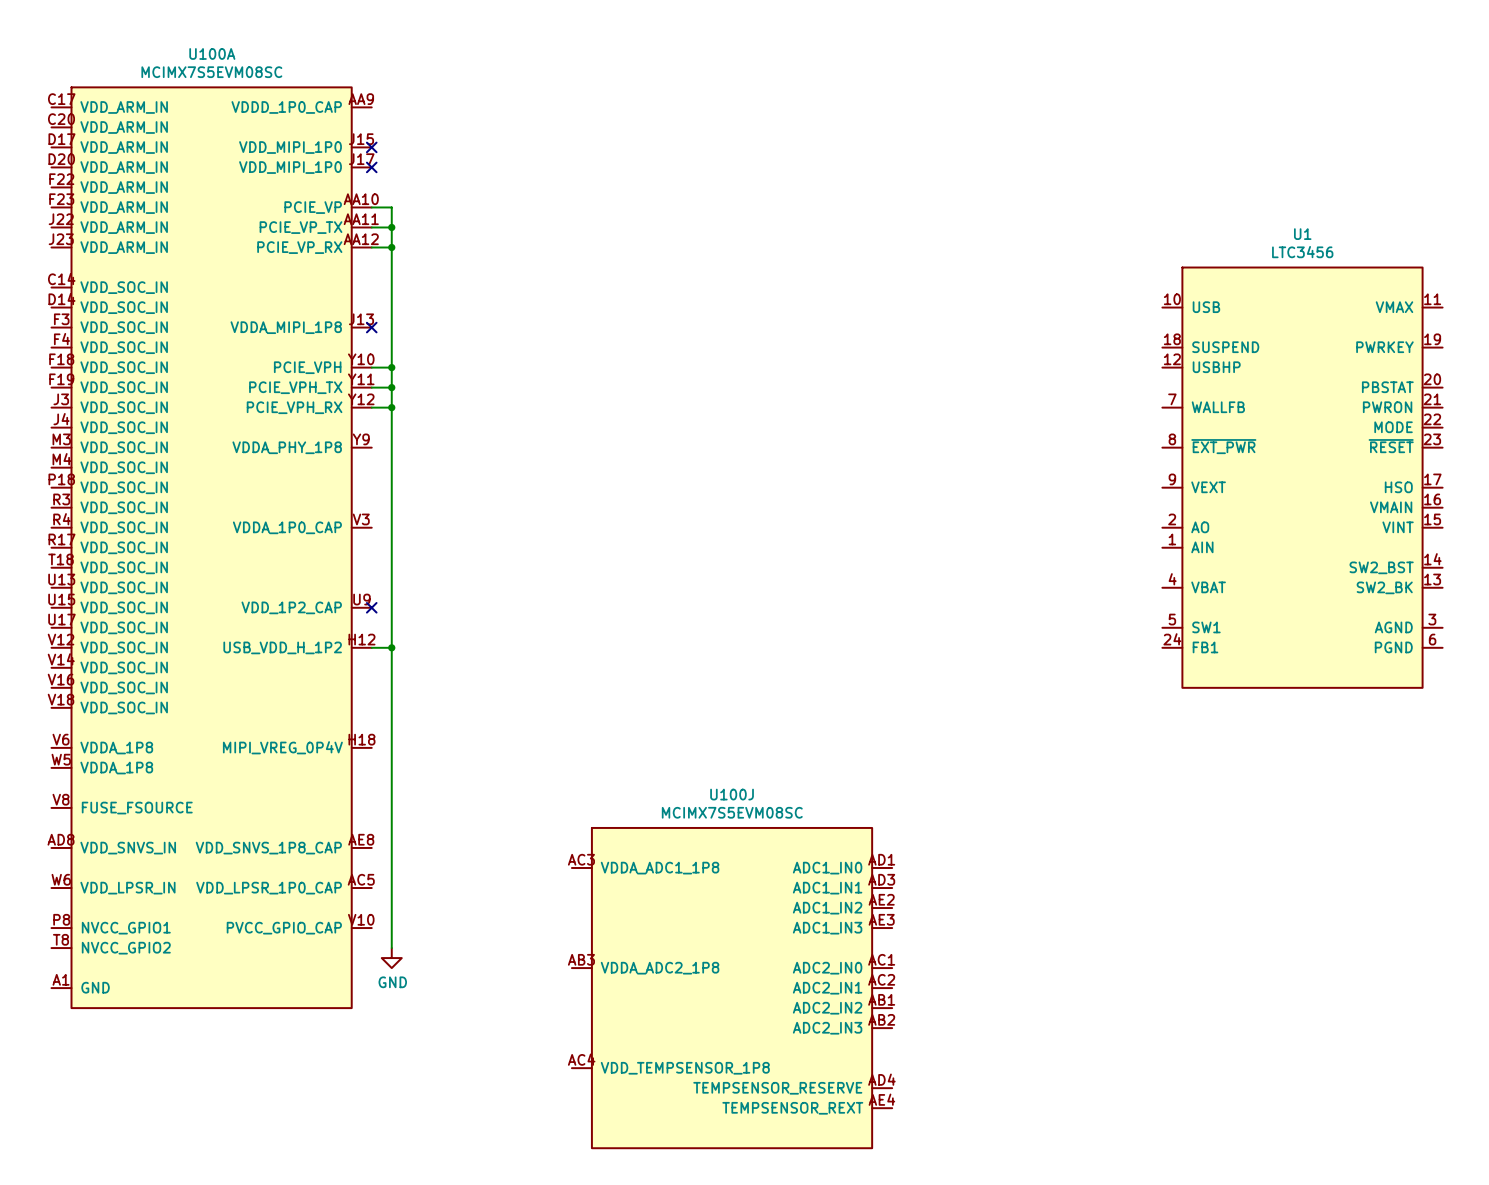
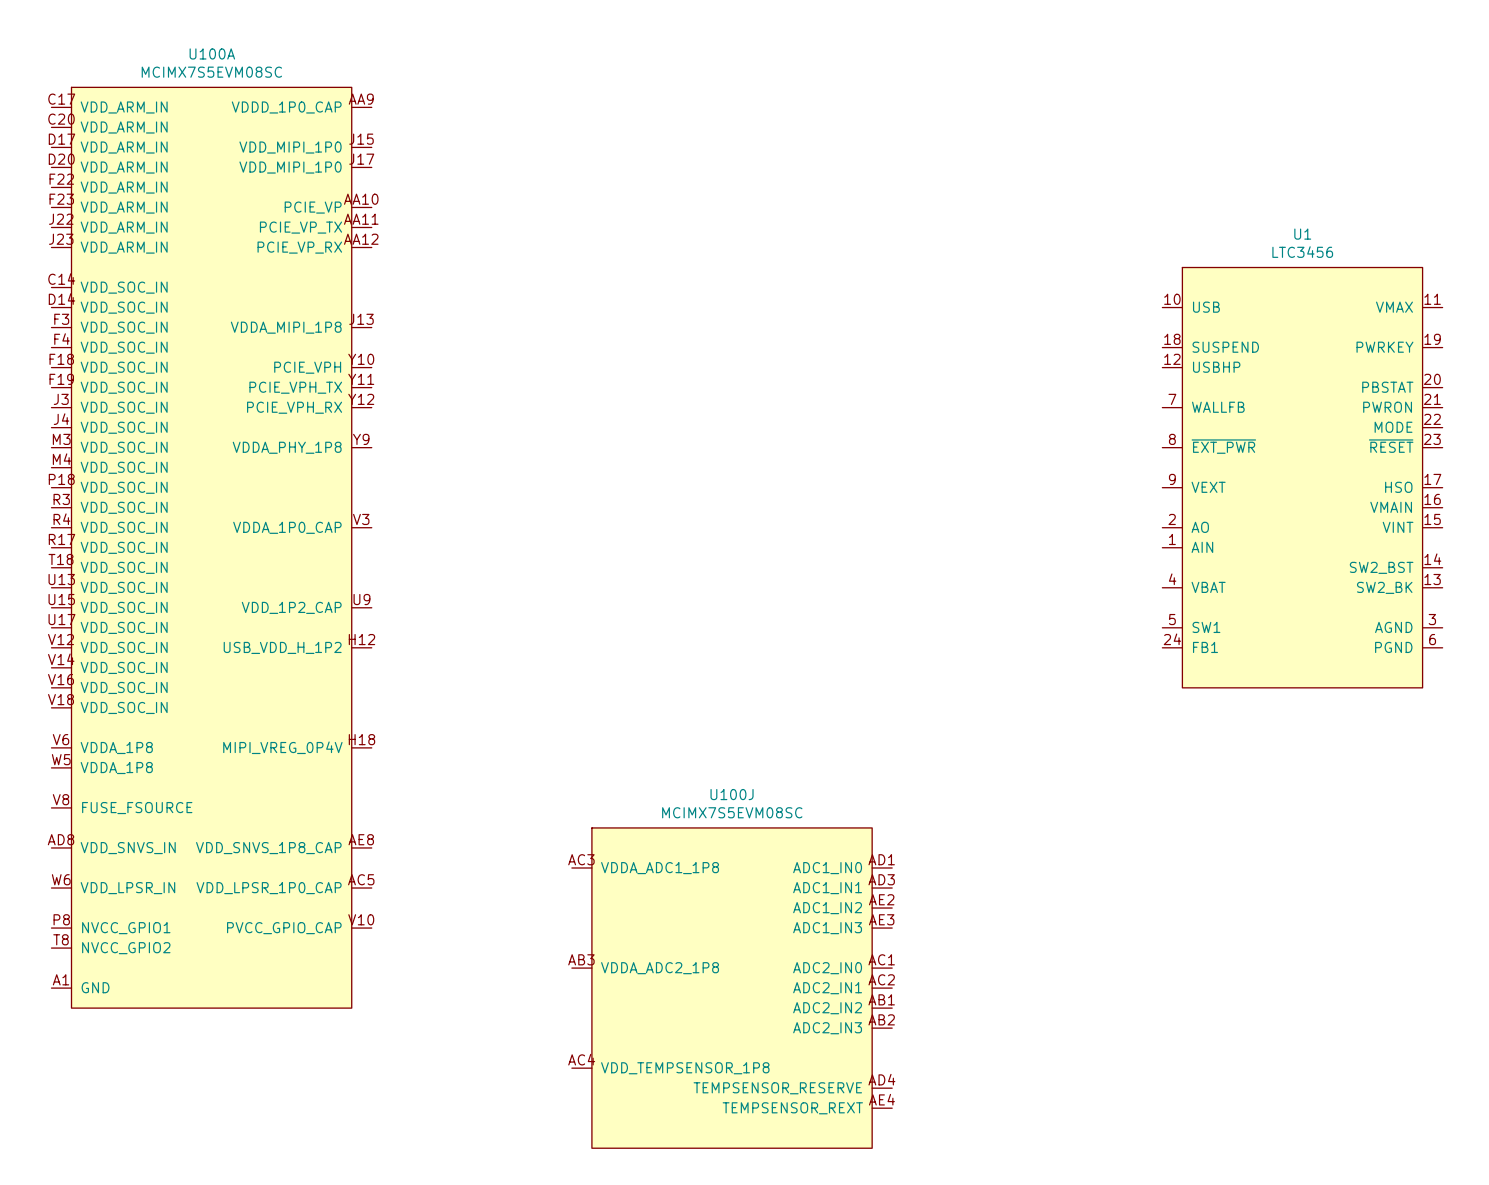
no-connect mark: (371, 147) -> none
no-connect mark: (371, 167) -> none
wire: (371, 207) (391, 207) (391, 948) -> none
wire: (371, 227) (391, 227) -> none
junction: (391, 227) -> none
wire: (371, 247) (391, 247) -> none
junction: (391, 247) -> none
no-connect mark: (371, 327) -> none
wire: (371, 367) (391, 367) -> none
junction: (391, 367) -> none
wire: (371, 387) (391, 387) -> none
junction: (391, 387) -> none
wire: (371, 407) (391, 407) -> none
junction: (391, 407) -> none
no-connect mark: (371, 607) -> none
wire: (371, 647) (391, 647) -> none
junction: (391, 647) -> none
power symbol: GND (391, 958) -> none

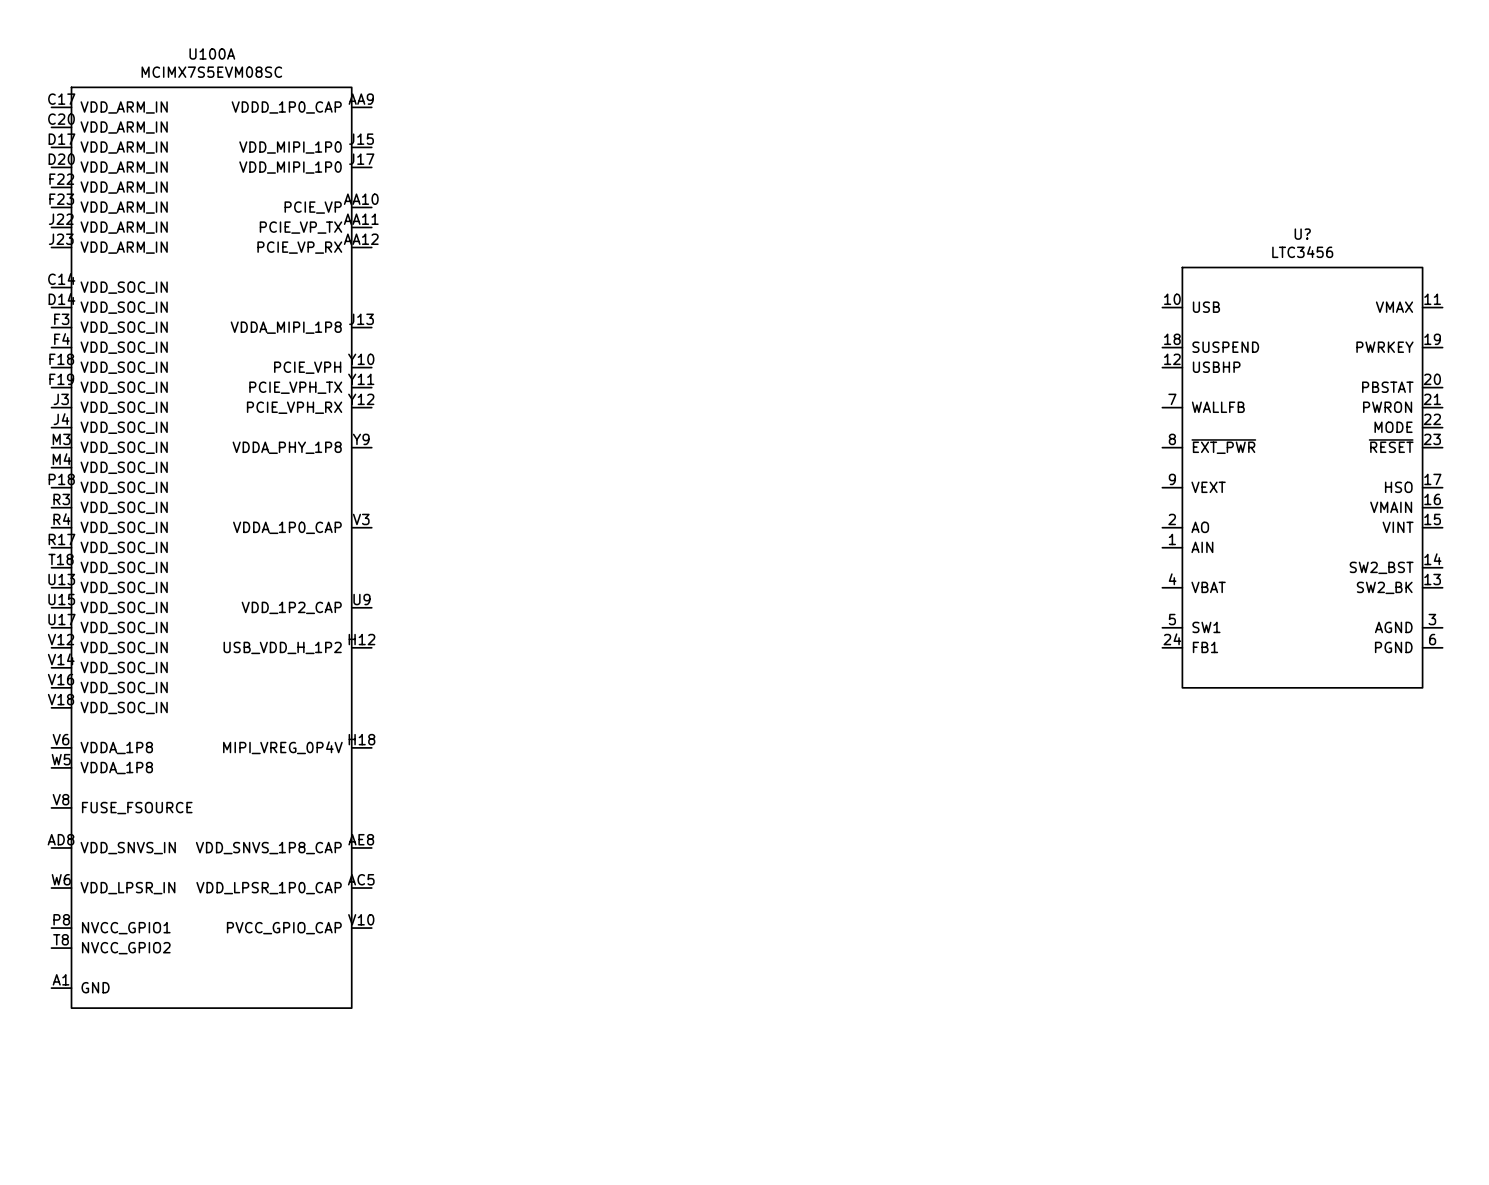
U1 name: U1 (1302, 234) -> U? (1302, 234)
U100J: MCIMX7S5EVM08SC (732, 988) -> none

